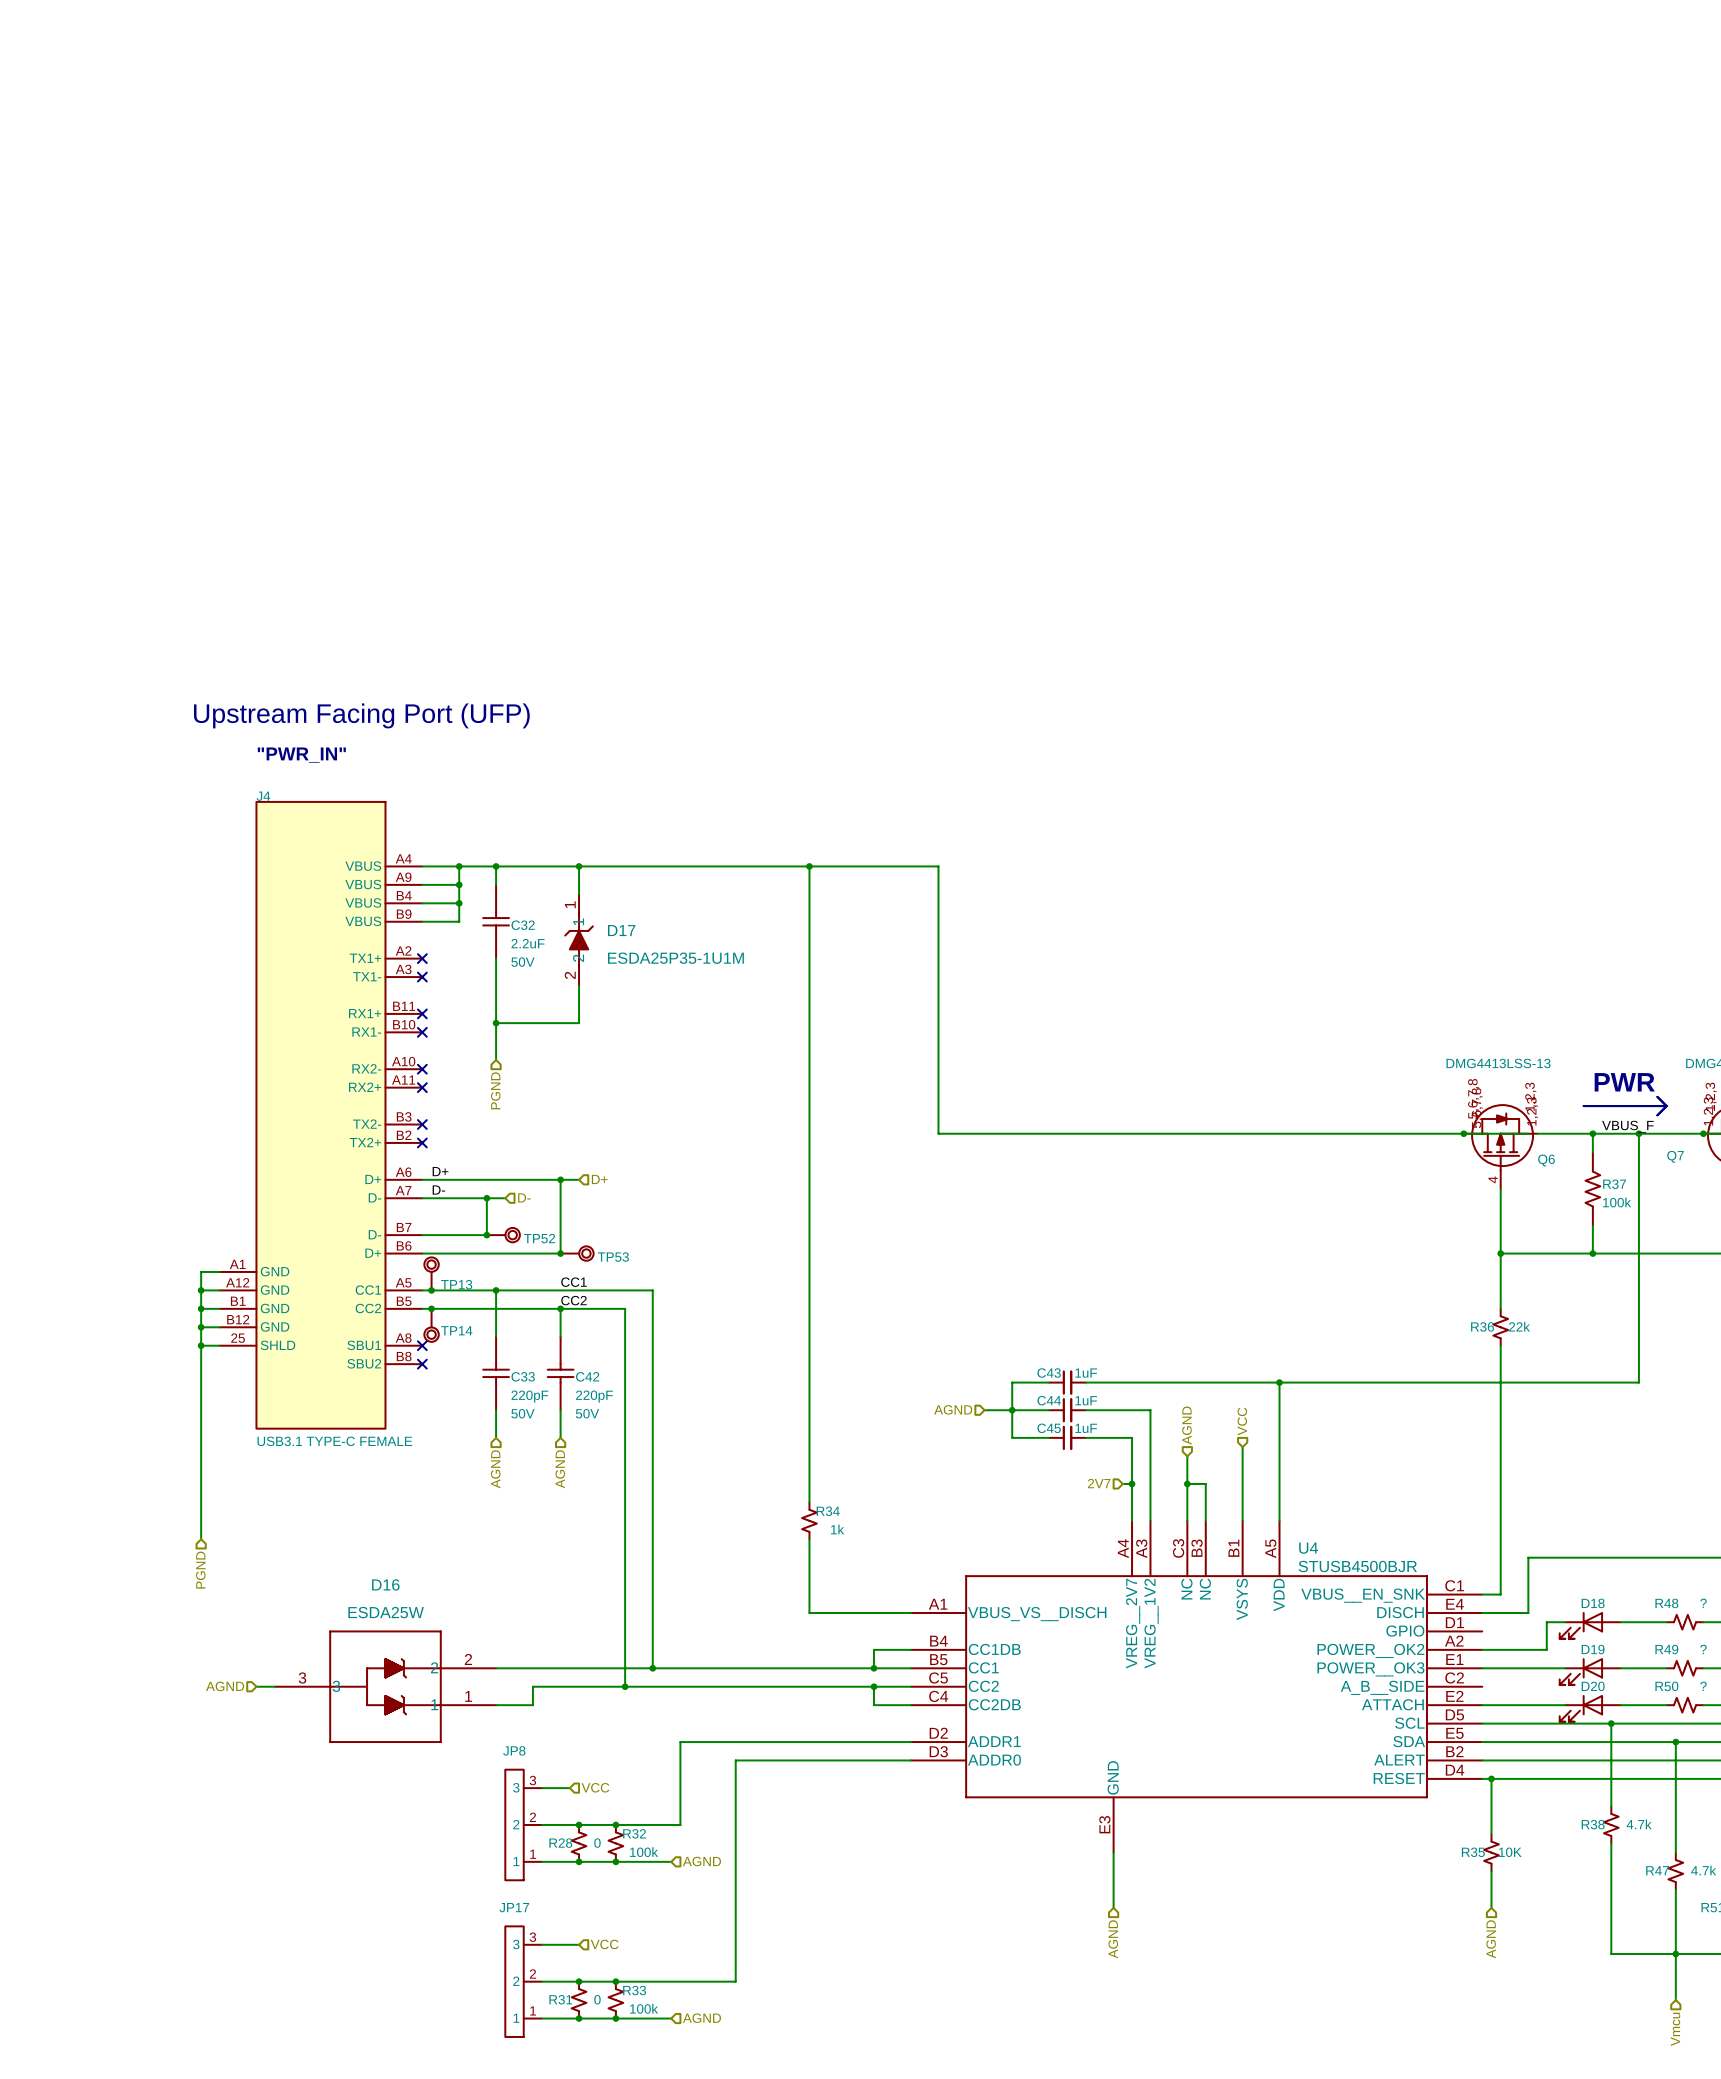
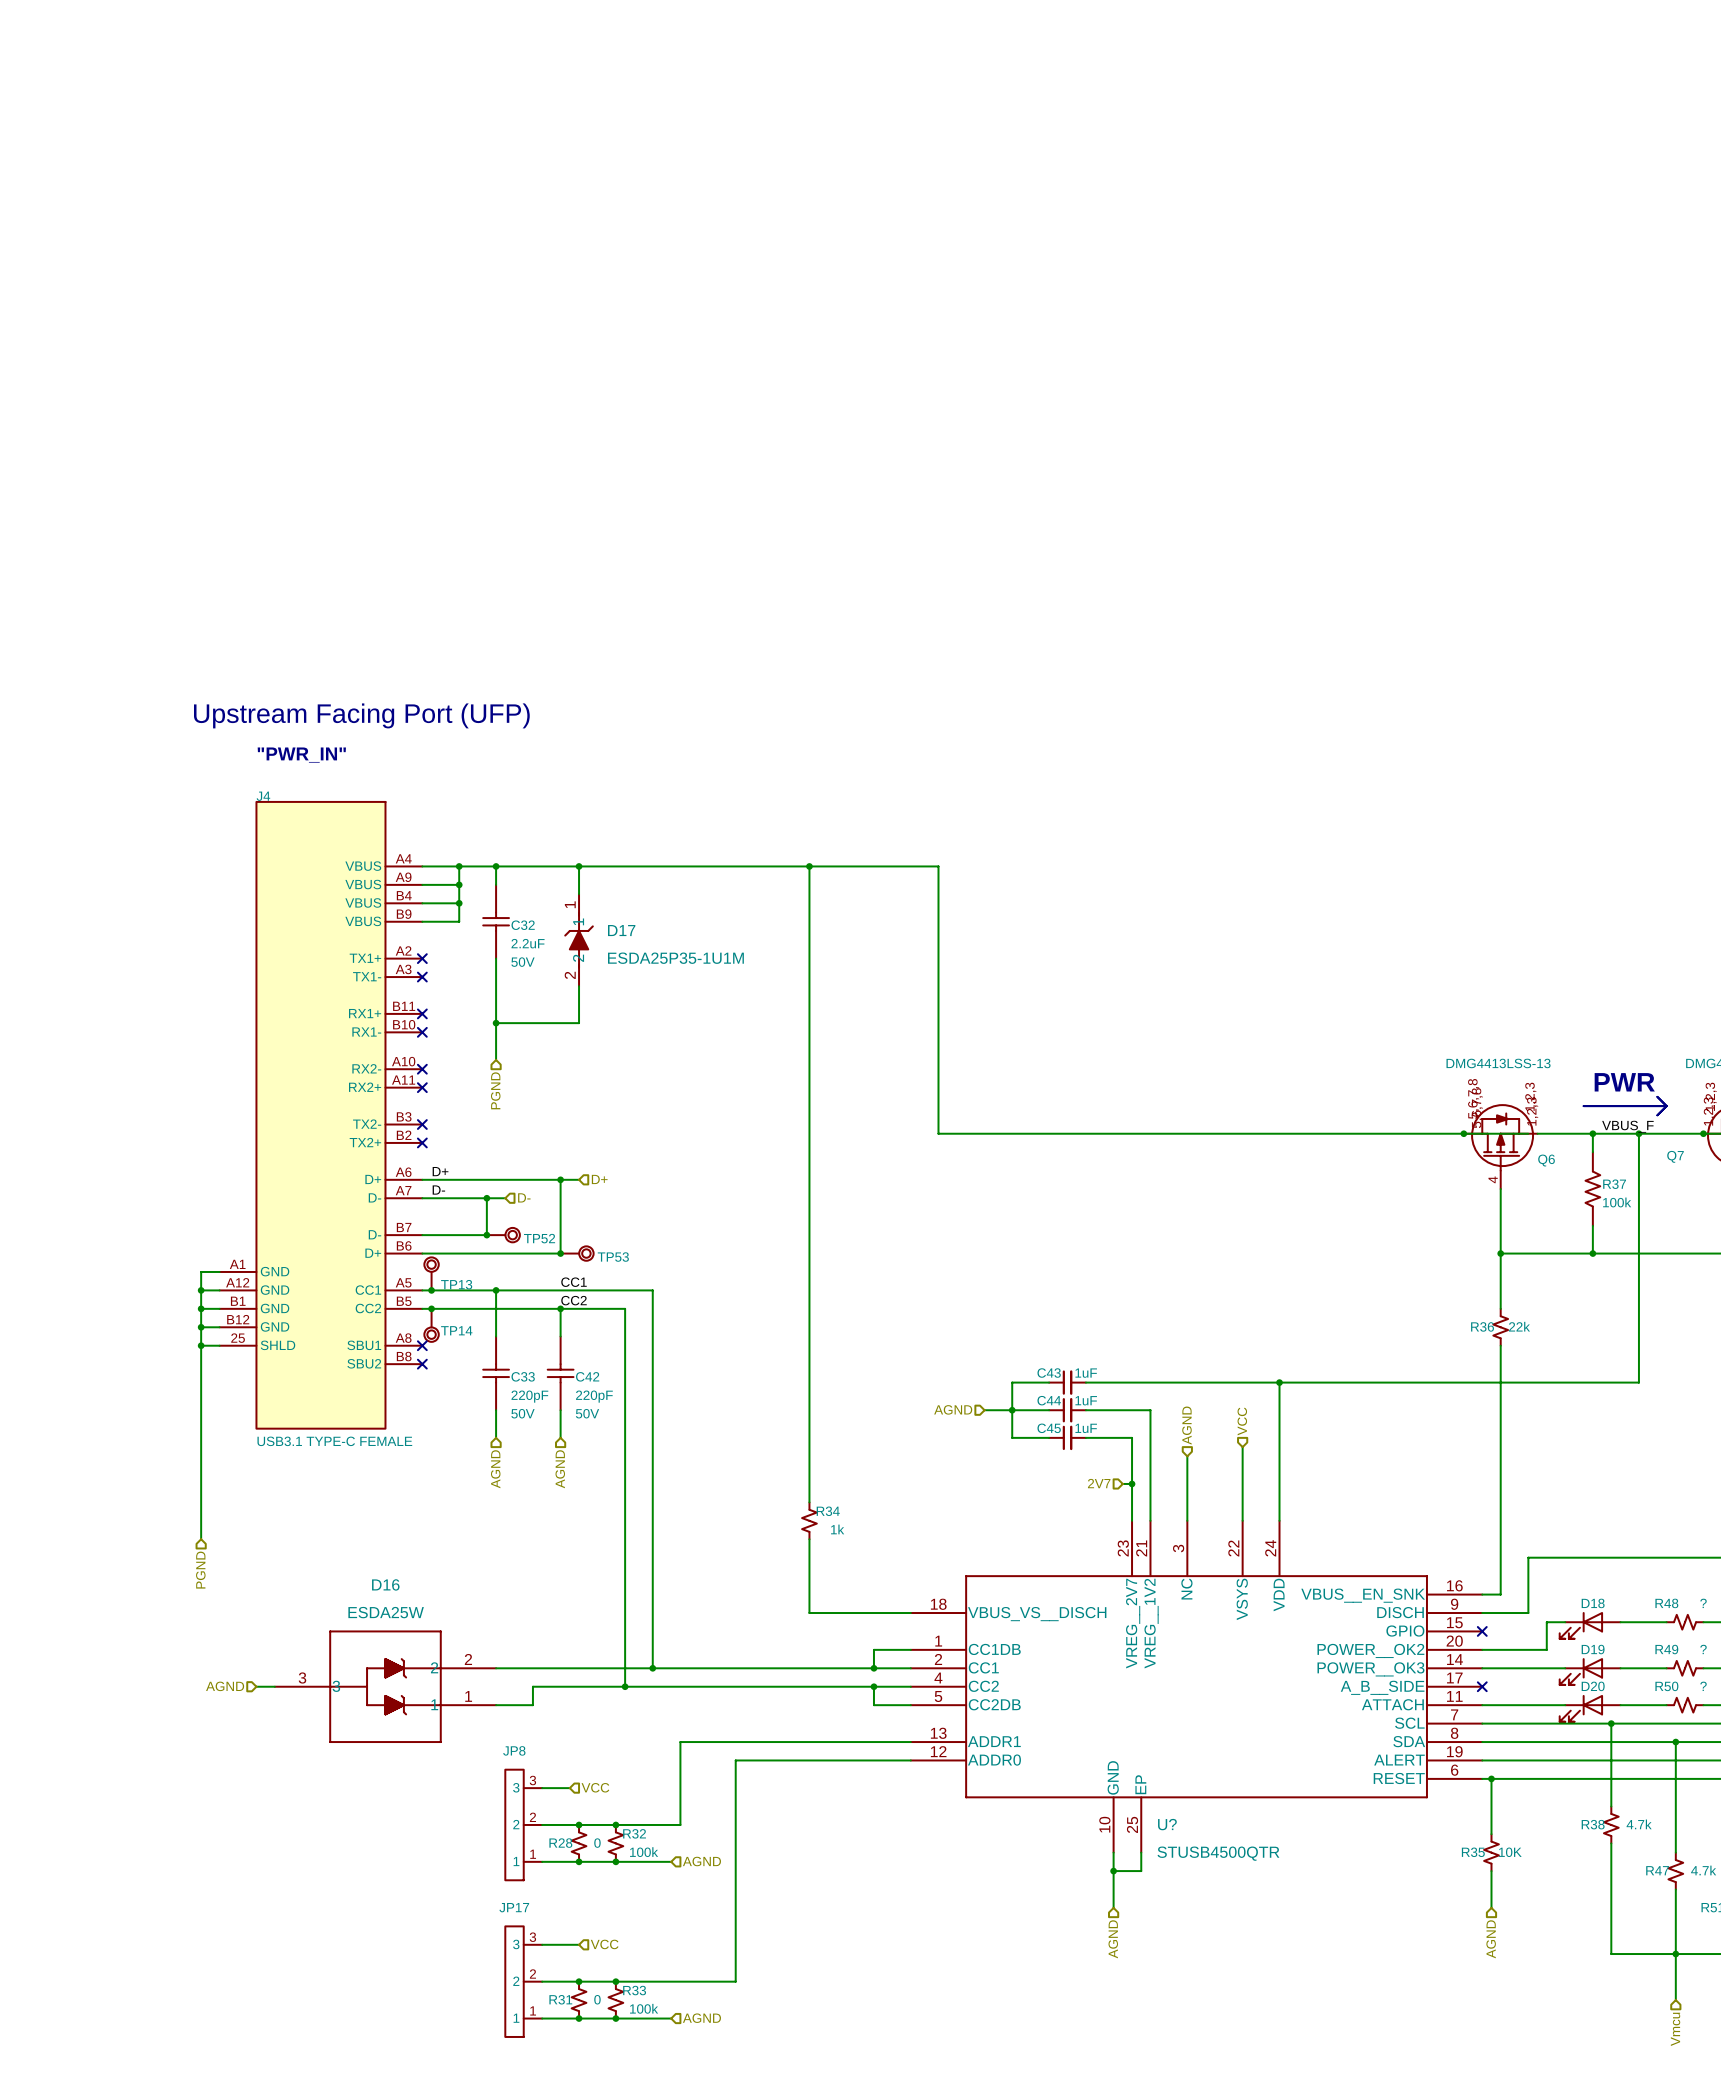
wire: (1187, 1483) (1205, 1483) (1205, 1520) -> none
junction: (1187, 1483) -> none
no-connect mark: none -> (1482, 1631)
U4: STUSB4500BJR (1196, 1686) -> none
U?: none -> STUSB4500QTR (1196, 1686)
no-connect mark: none -> (1482, 1686)
wire: none -> (1141, 1852) (1141, 1871) (1113, 1871)
junction: none -> (1113, 1871)

